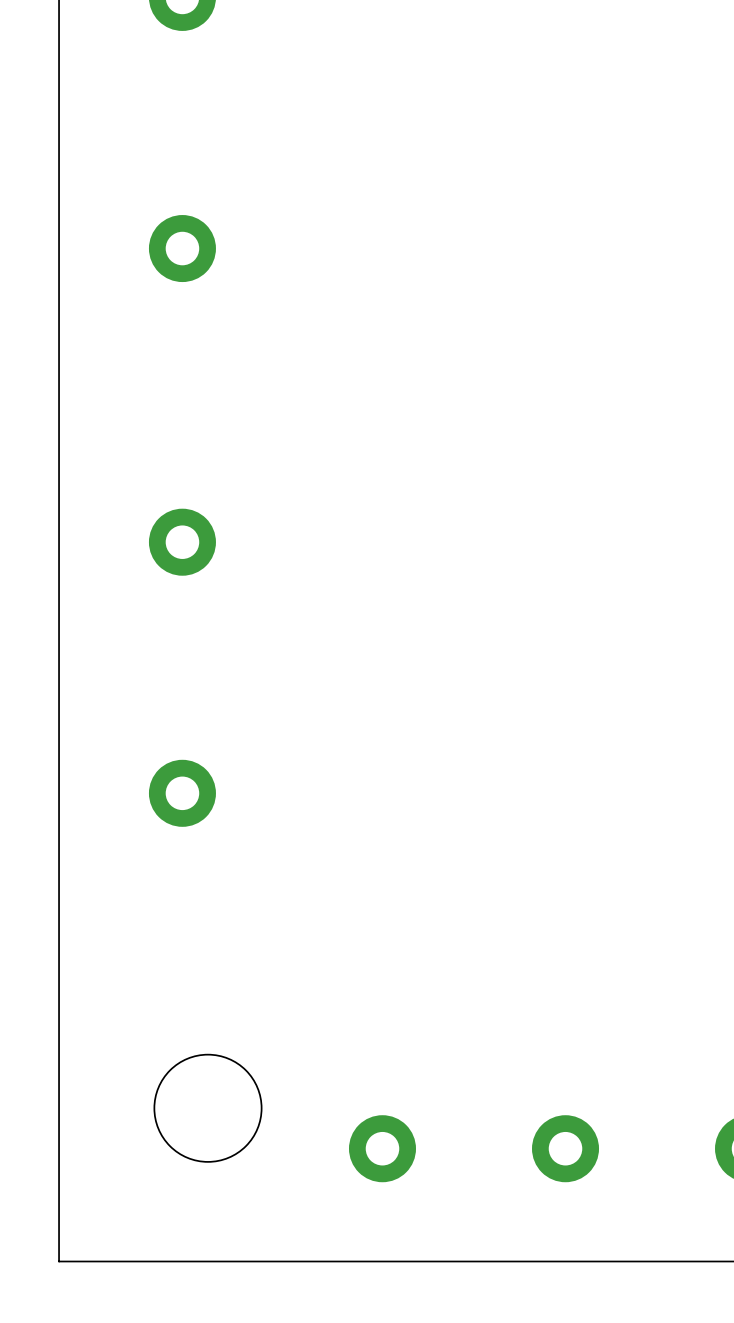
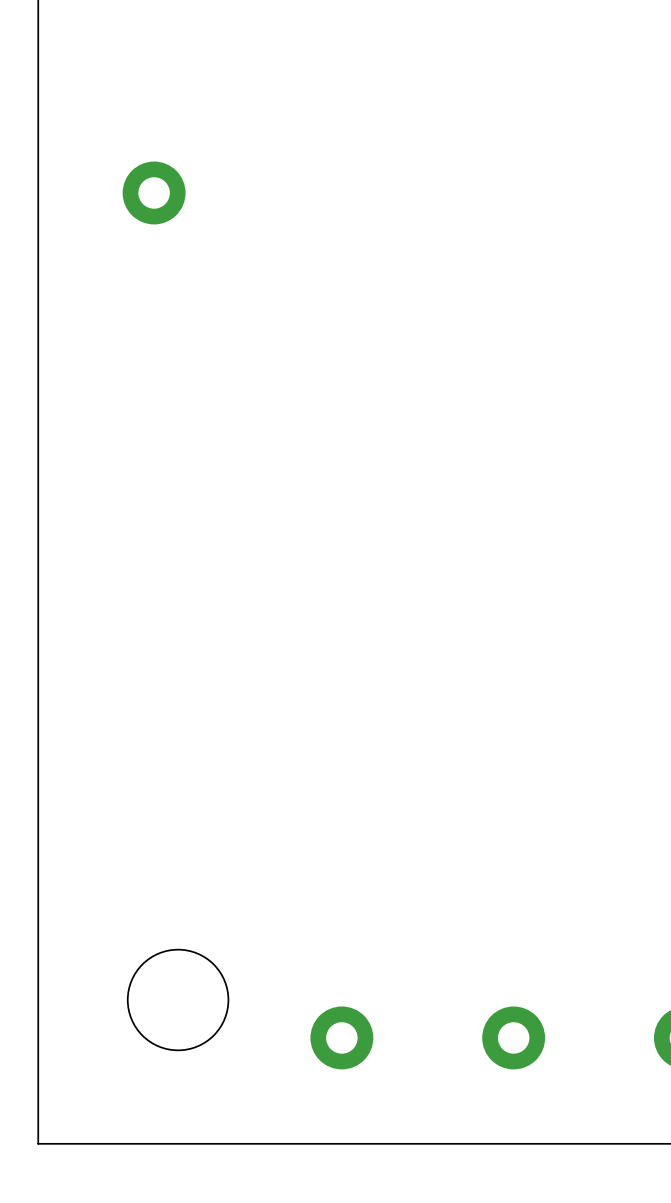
part: (182, 542) -> none
part: (182, 793) -> none

